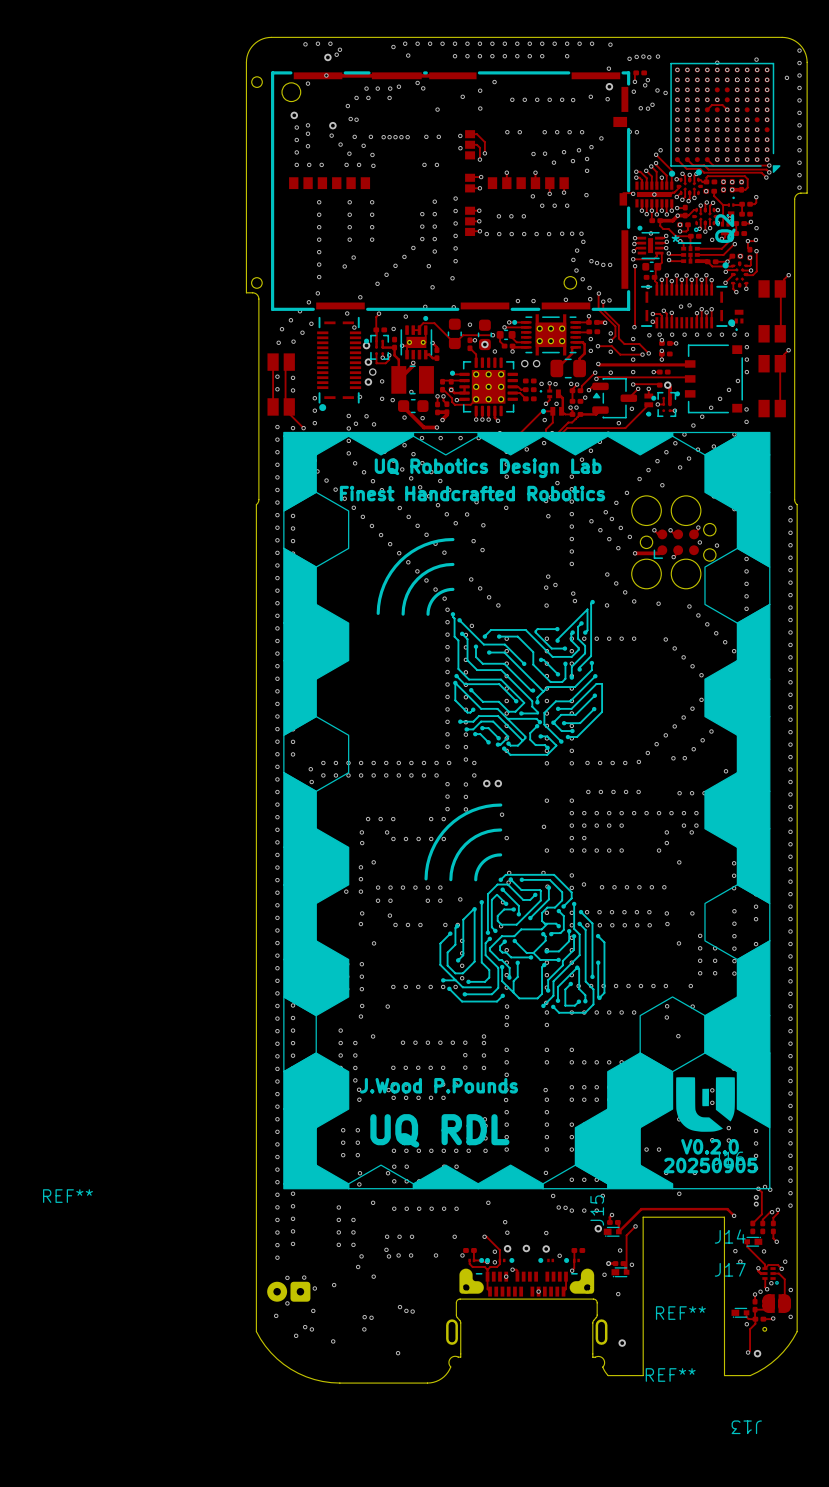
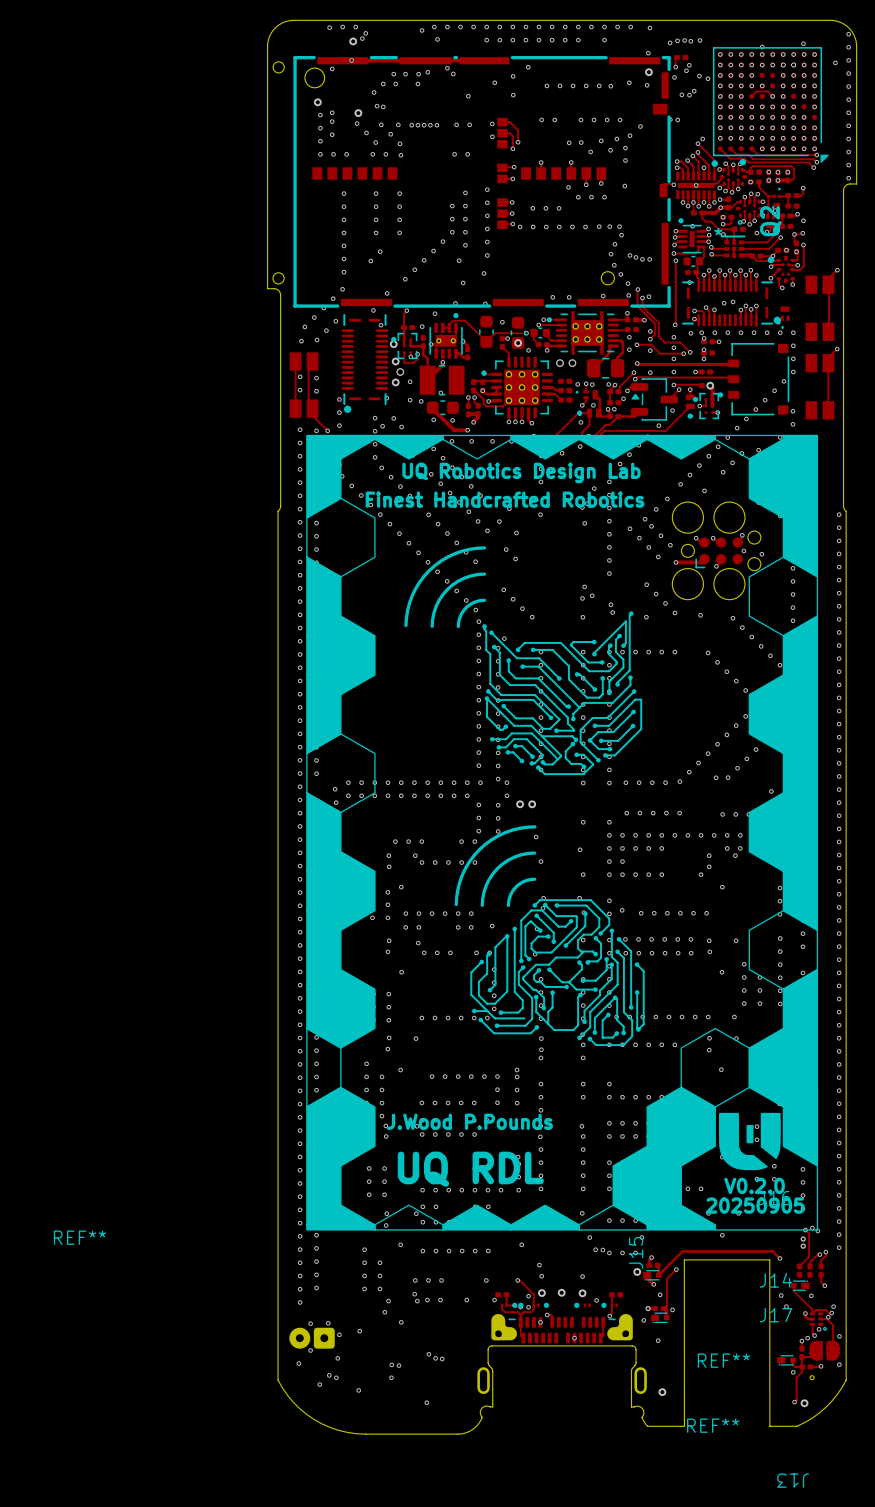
track: none -> (647, 1275) (653, 1284)
via: none -> (653, 1284)
via: none -> (831, 1313)
via: (781, 1268) -> none
via: none -> (828, 1317)

